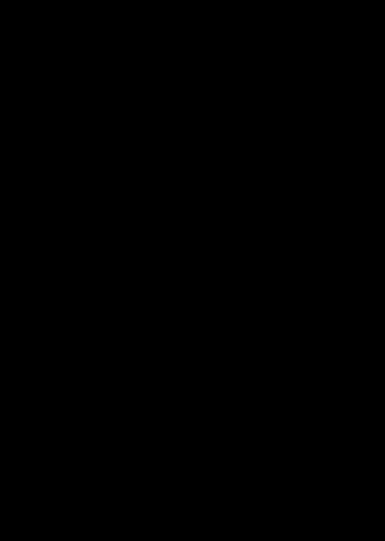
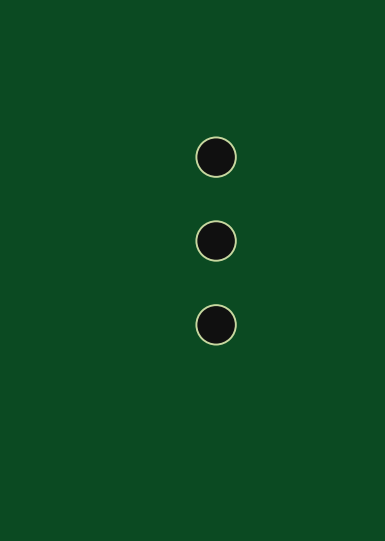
part: none -> (216, 157)
part: none -> (216, 240)
part: none -> (216, 324)

